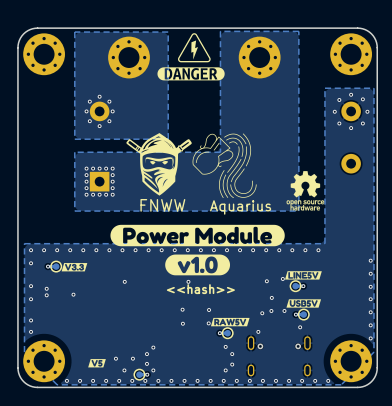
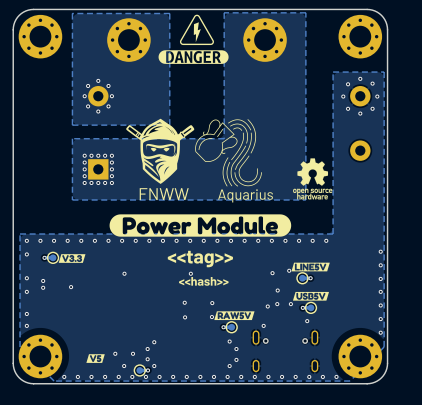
drawing: [165, 254, 231, 276] -> none
text: none -> <<tag>> (200, 259)

